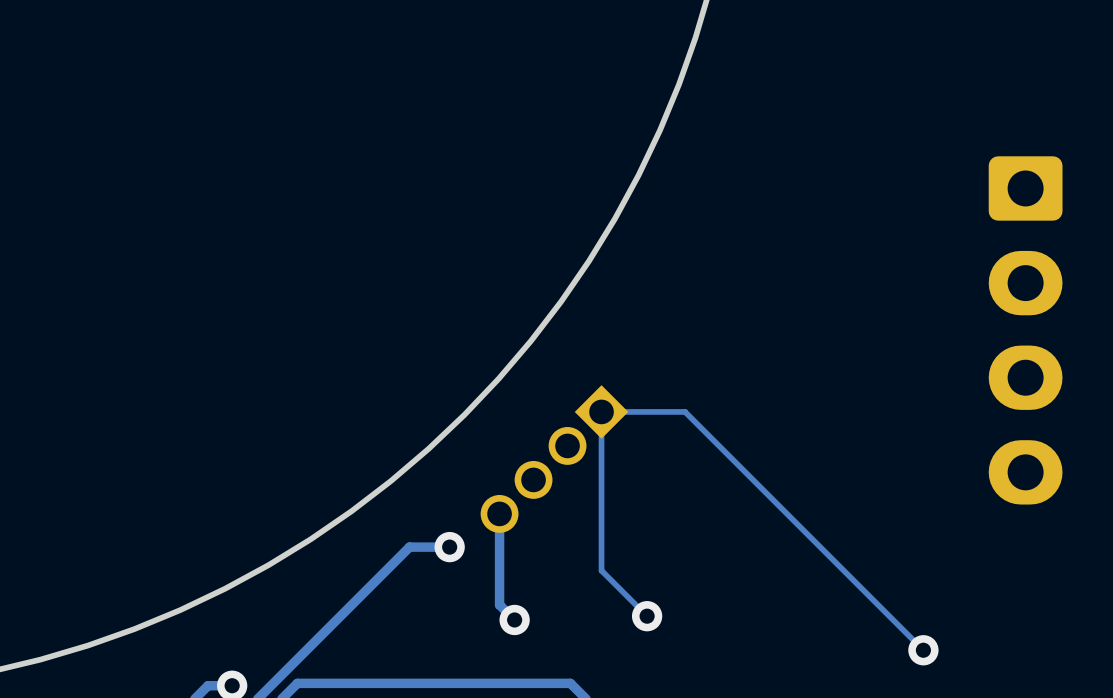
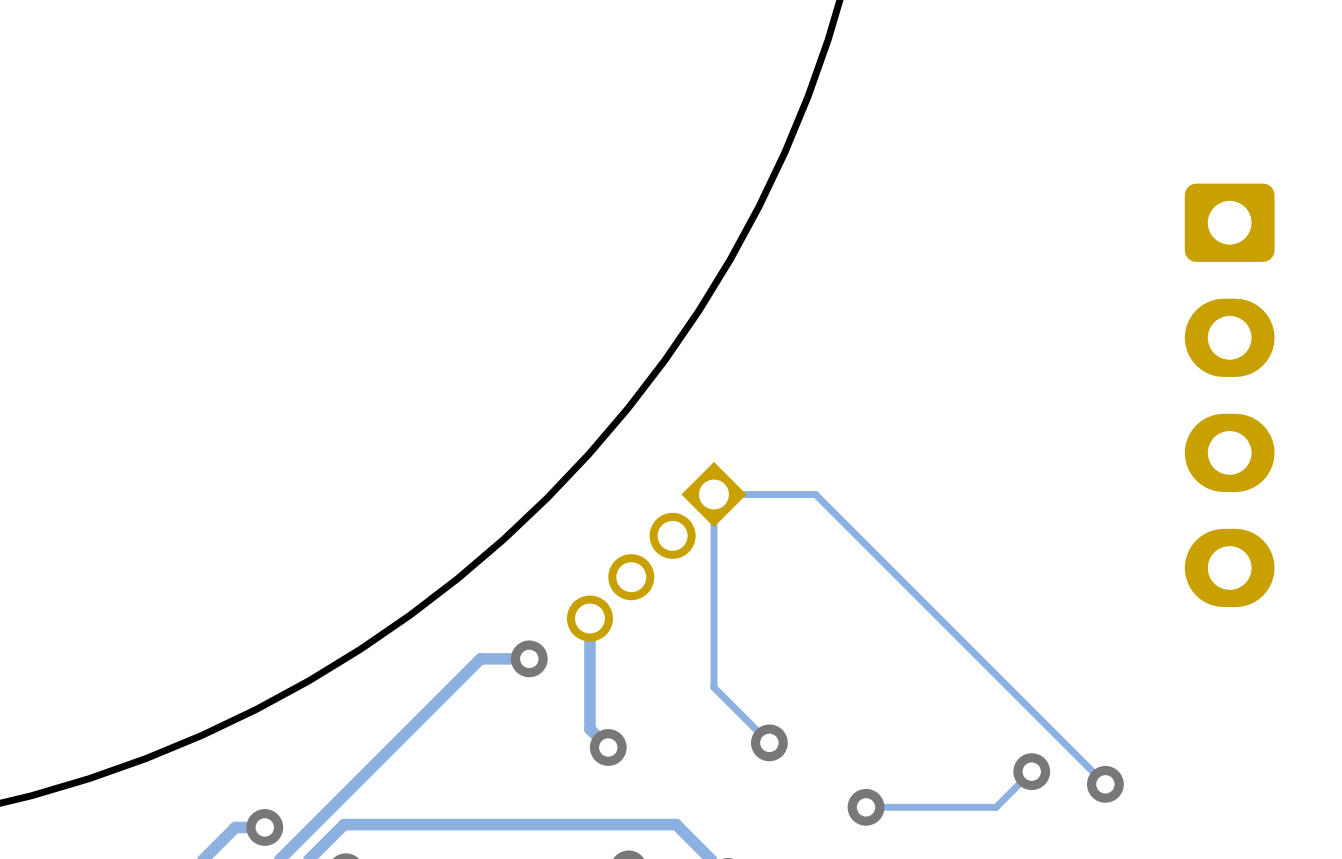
track: none -> (1031, 771) (996, 807) (866, 807)
via: none -> (1031, 771)
via: none -> (866, 807)

